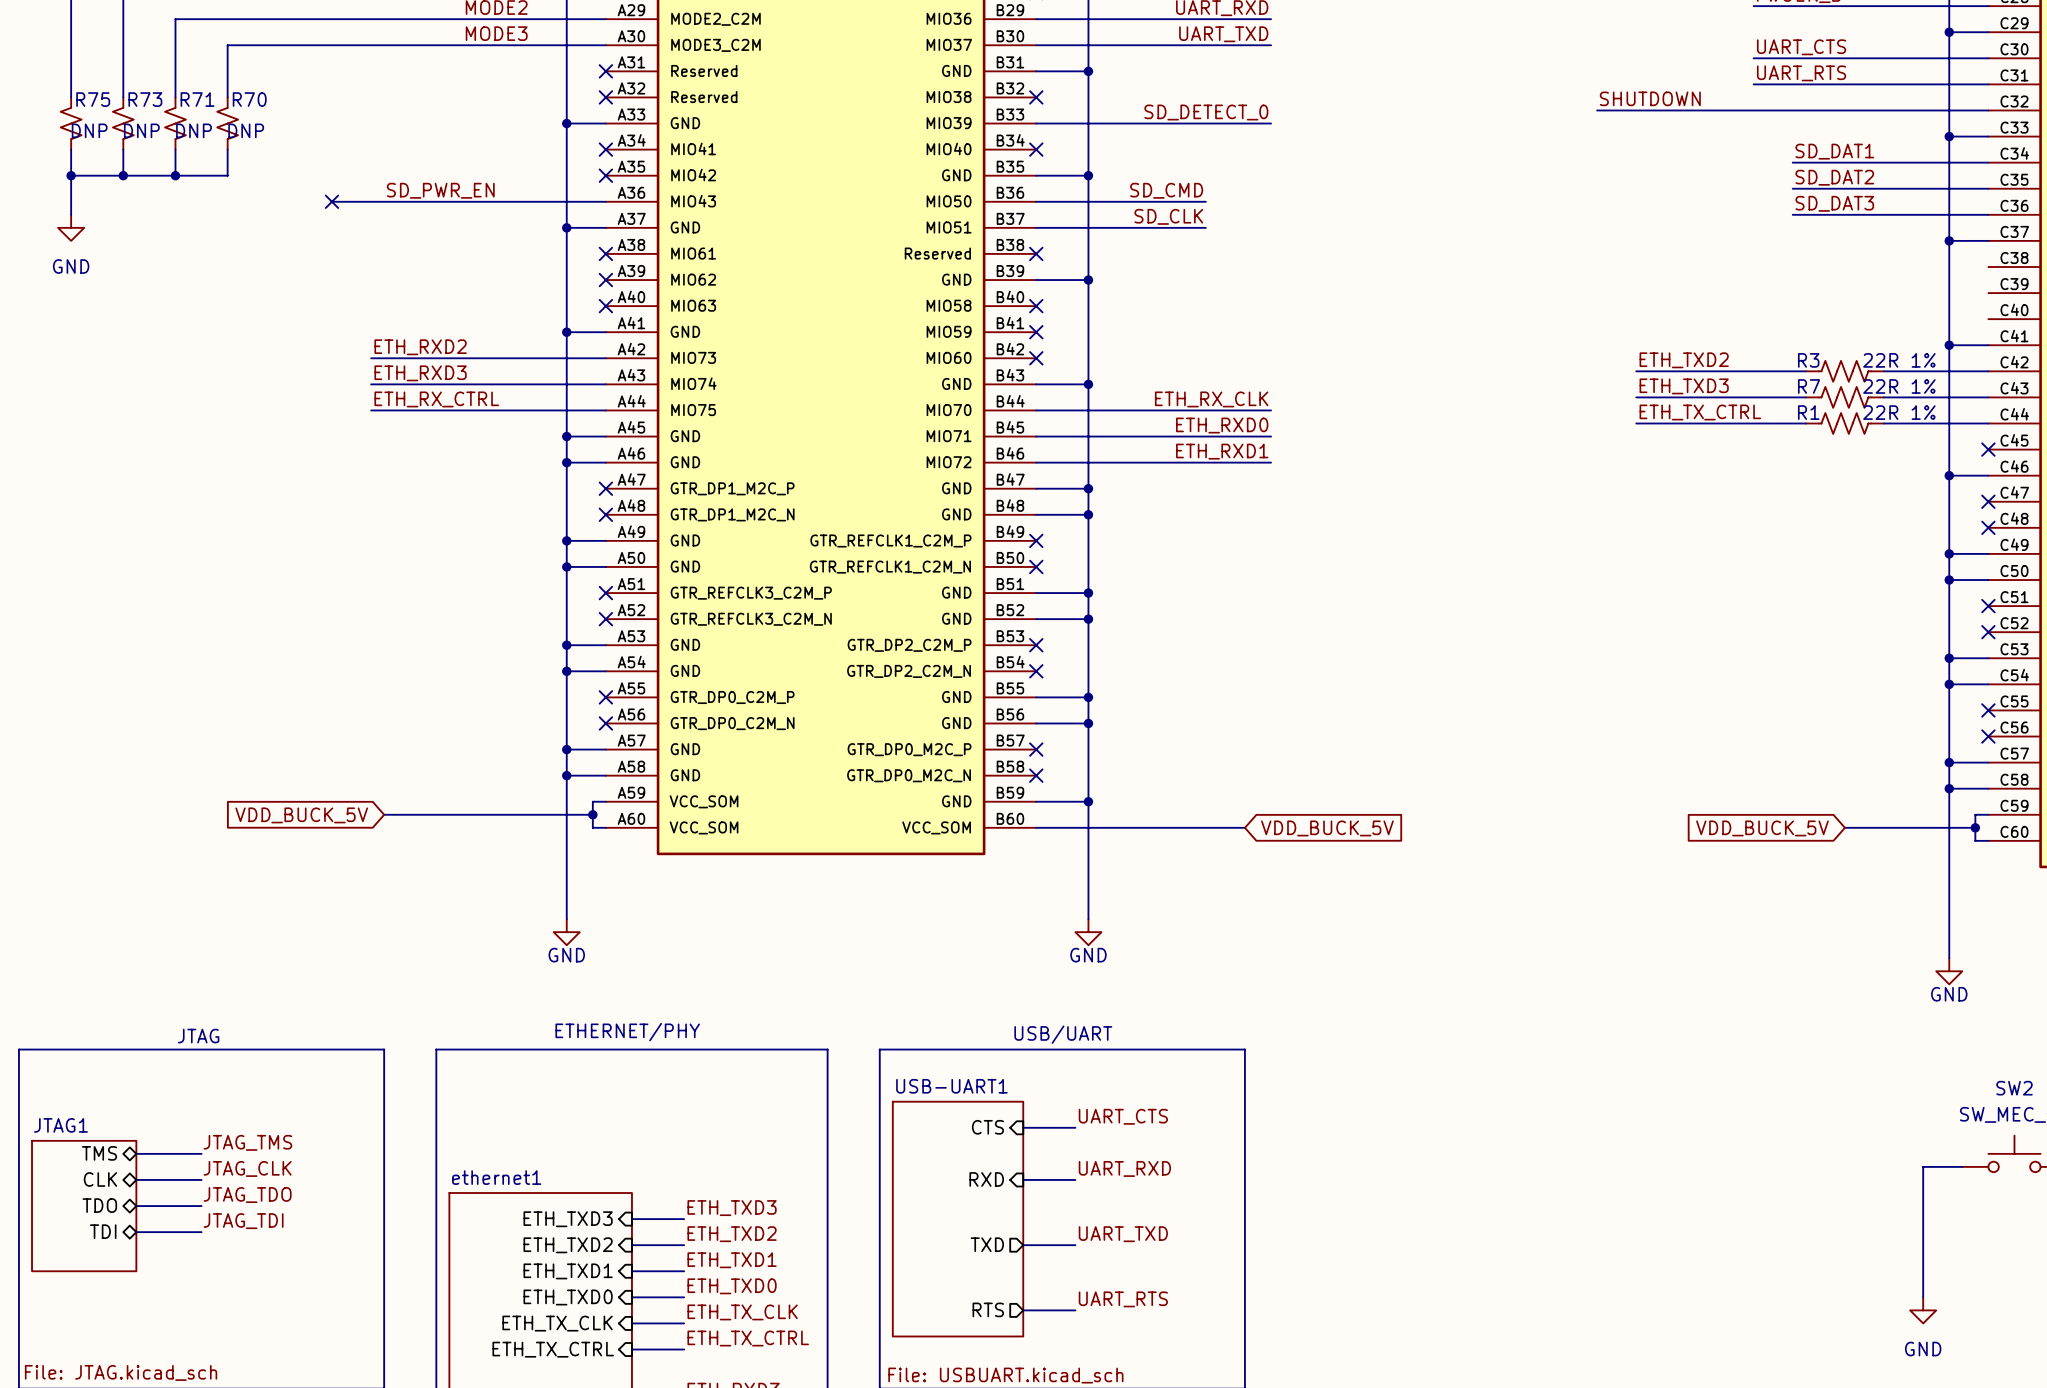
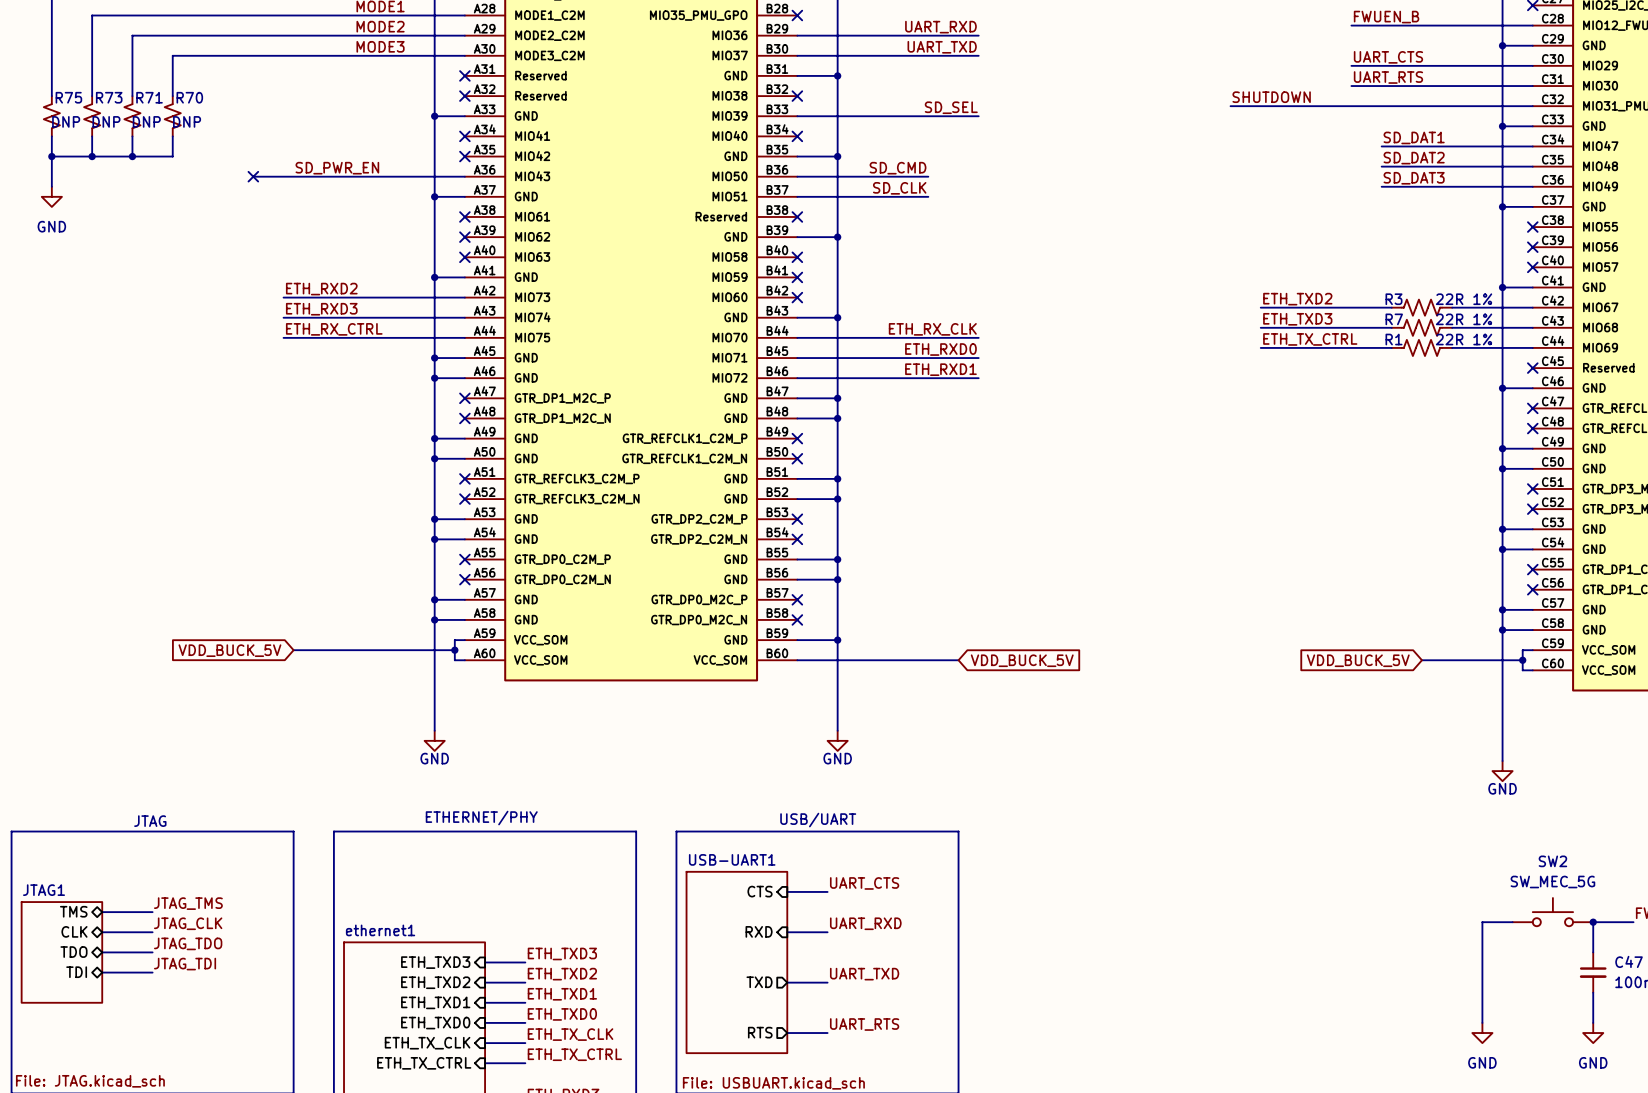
label: SD_DETECT_0 (1206, 112) -> SD_SEL (951, 107)
no-connect mark: none -> (1532, 227)
no-connect mark: none -> (1532, 247)
no-connect mark: none -> (1532, 267)

